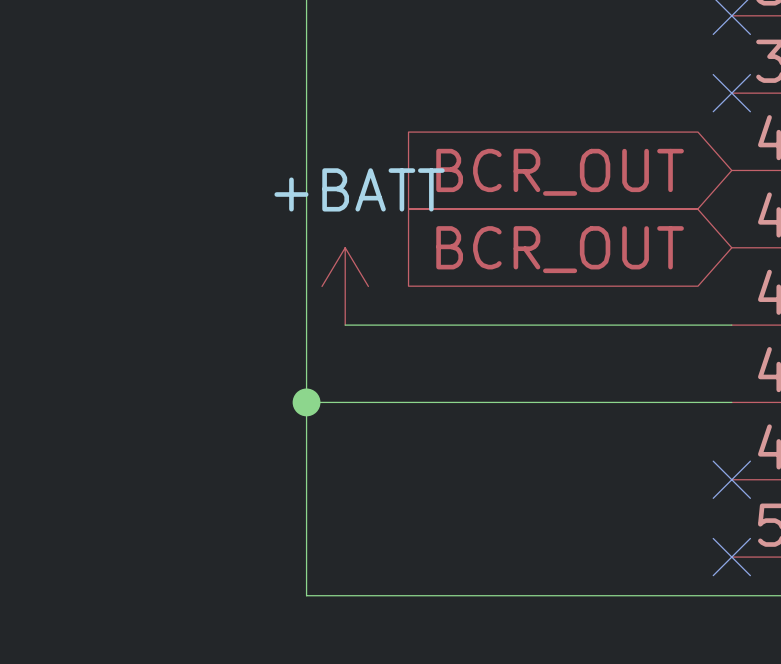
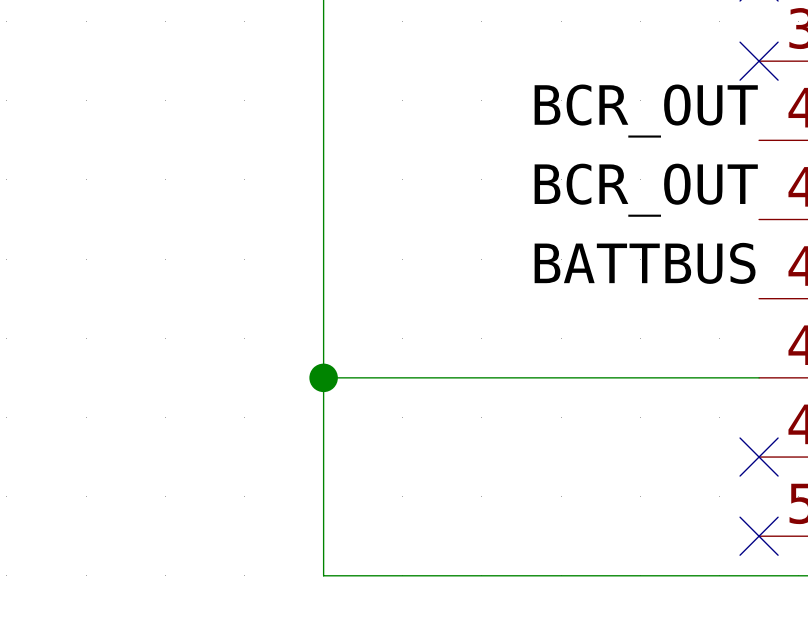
label: none -> BCR_OUT (646, 111)
global label: BCR_OUT (560, 172) -> none
label: none -> BCR_OUT (646, 190)
global label: BCR_OUT (560, 249) -> none
power symbol: +BATT (345, 286) -> none
label: none -> BATTBUS (645, 263)
wire: (345, 325) (731, 325) -> none

